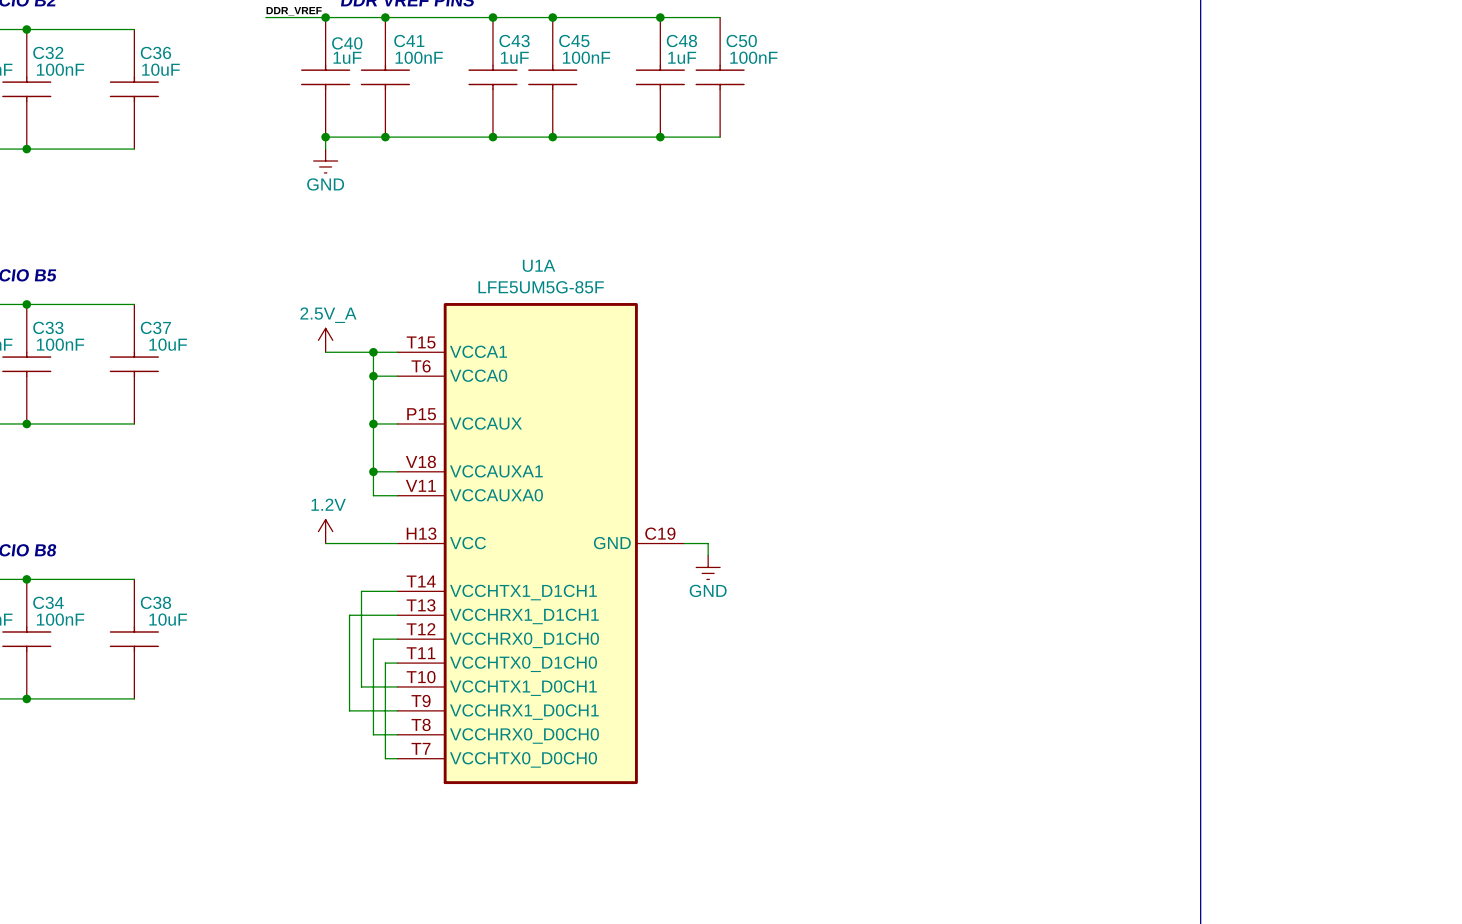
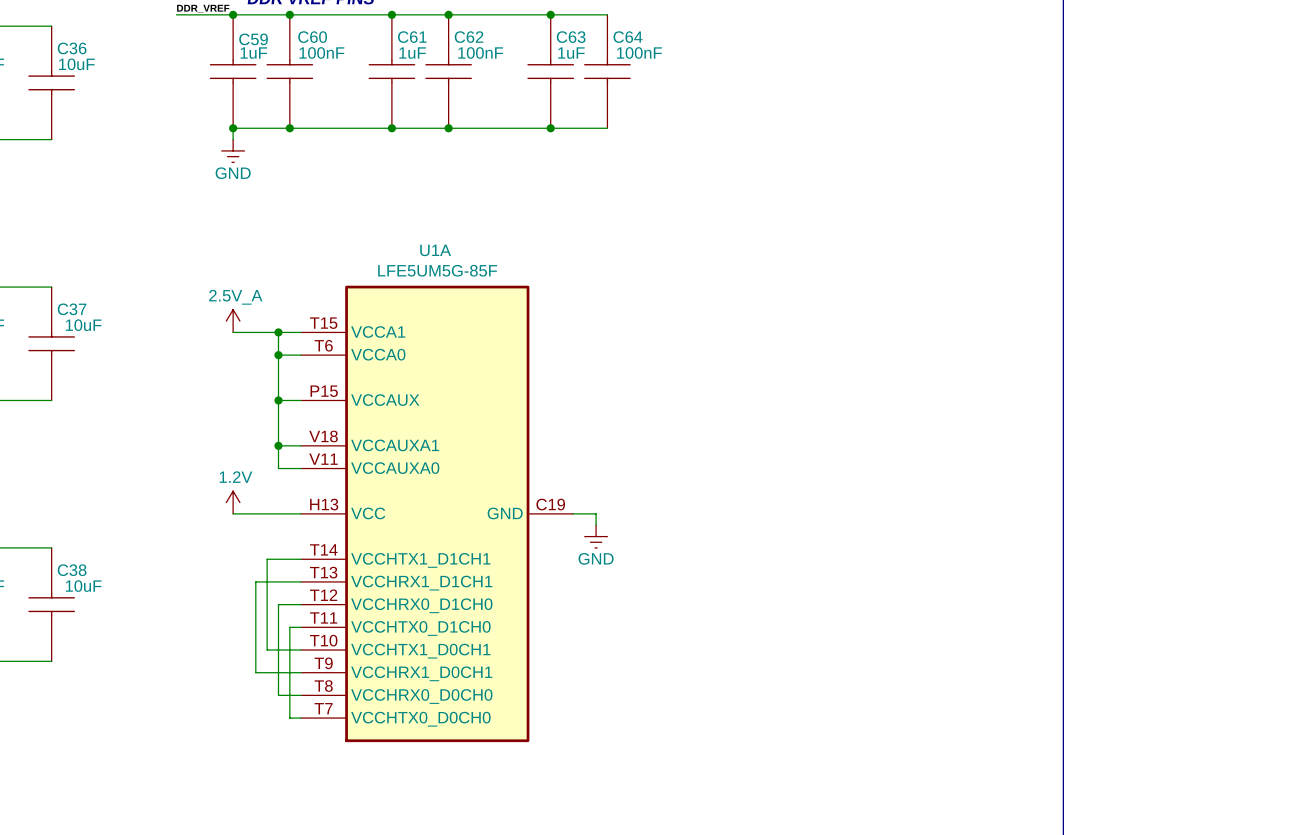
C41 name: C41 (409, 41) -> C60 (312, 37)
C43 name: C43 (514, 41) -> C61 (412, 37)
C45 name: C45 (574, 41) -> C62 (469, 37)
C48 name: C48 (681, 41) -> C63 (571, 37)
C50 name: C50 (741, 41) -> C64 (628, 37)
C40 name: C40 (347, 43) -> C59 (253, 39)

